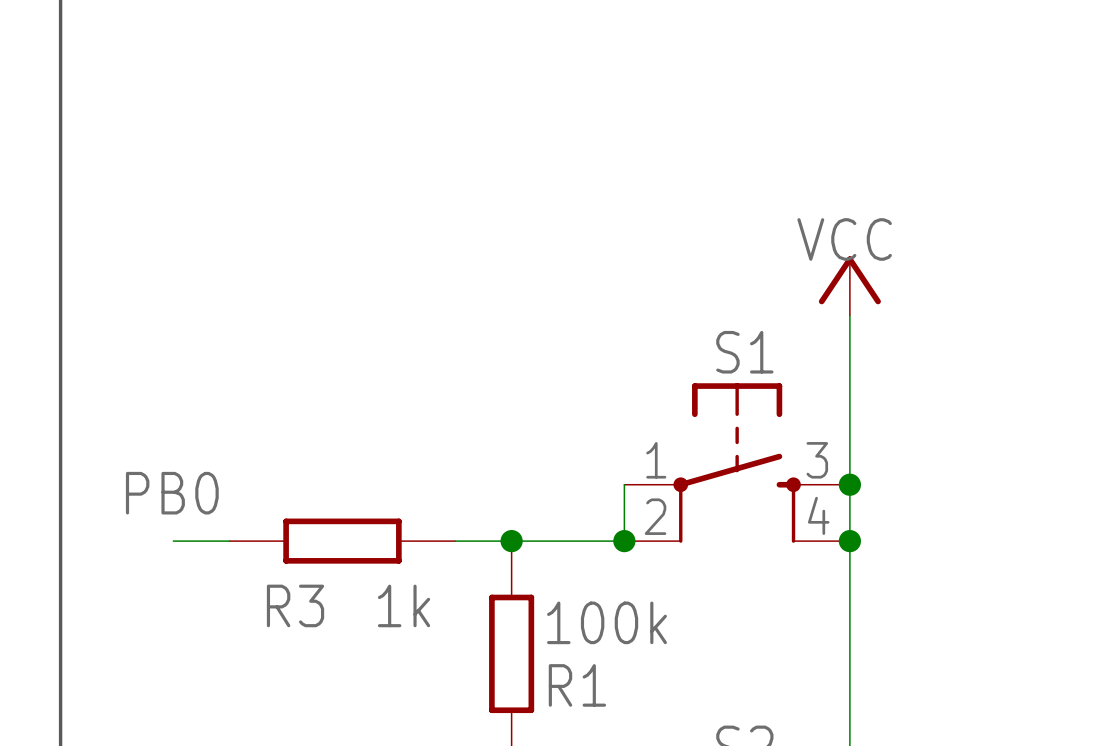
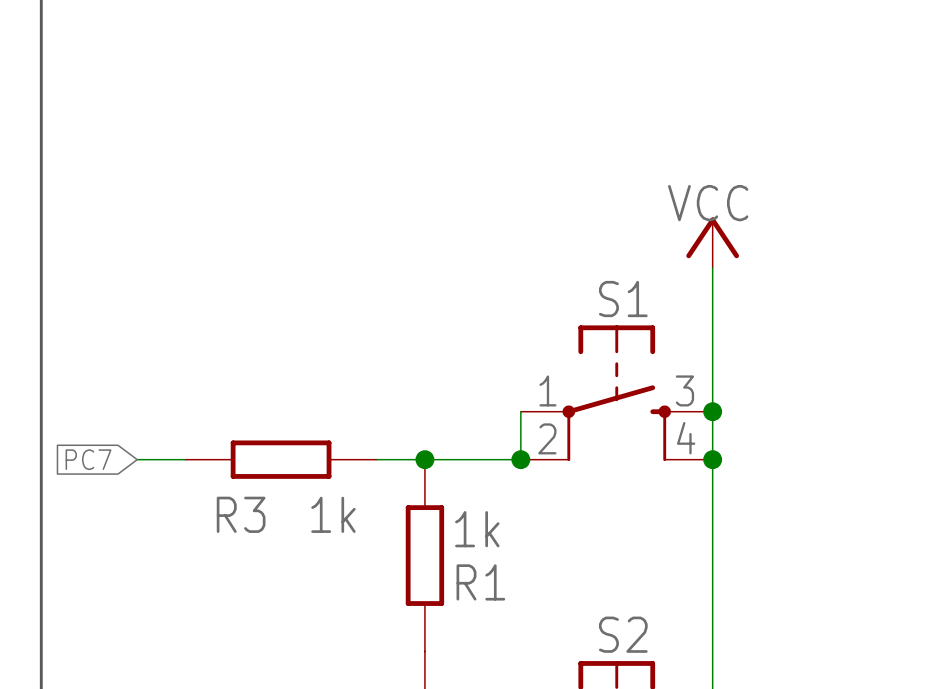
label: PB0 (172, 493) -> none
global label: none -> PC7 (88, 459)
R1 value: 100k (607, 622) -> 1k (477, 529)

